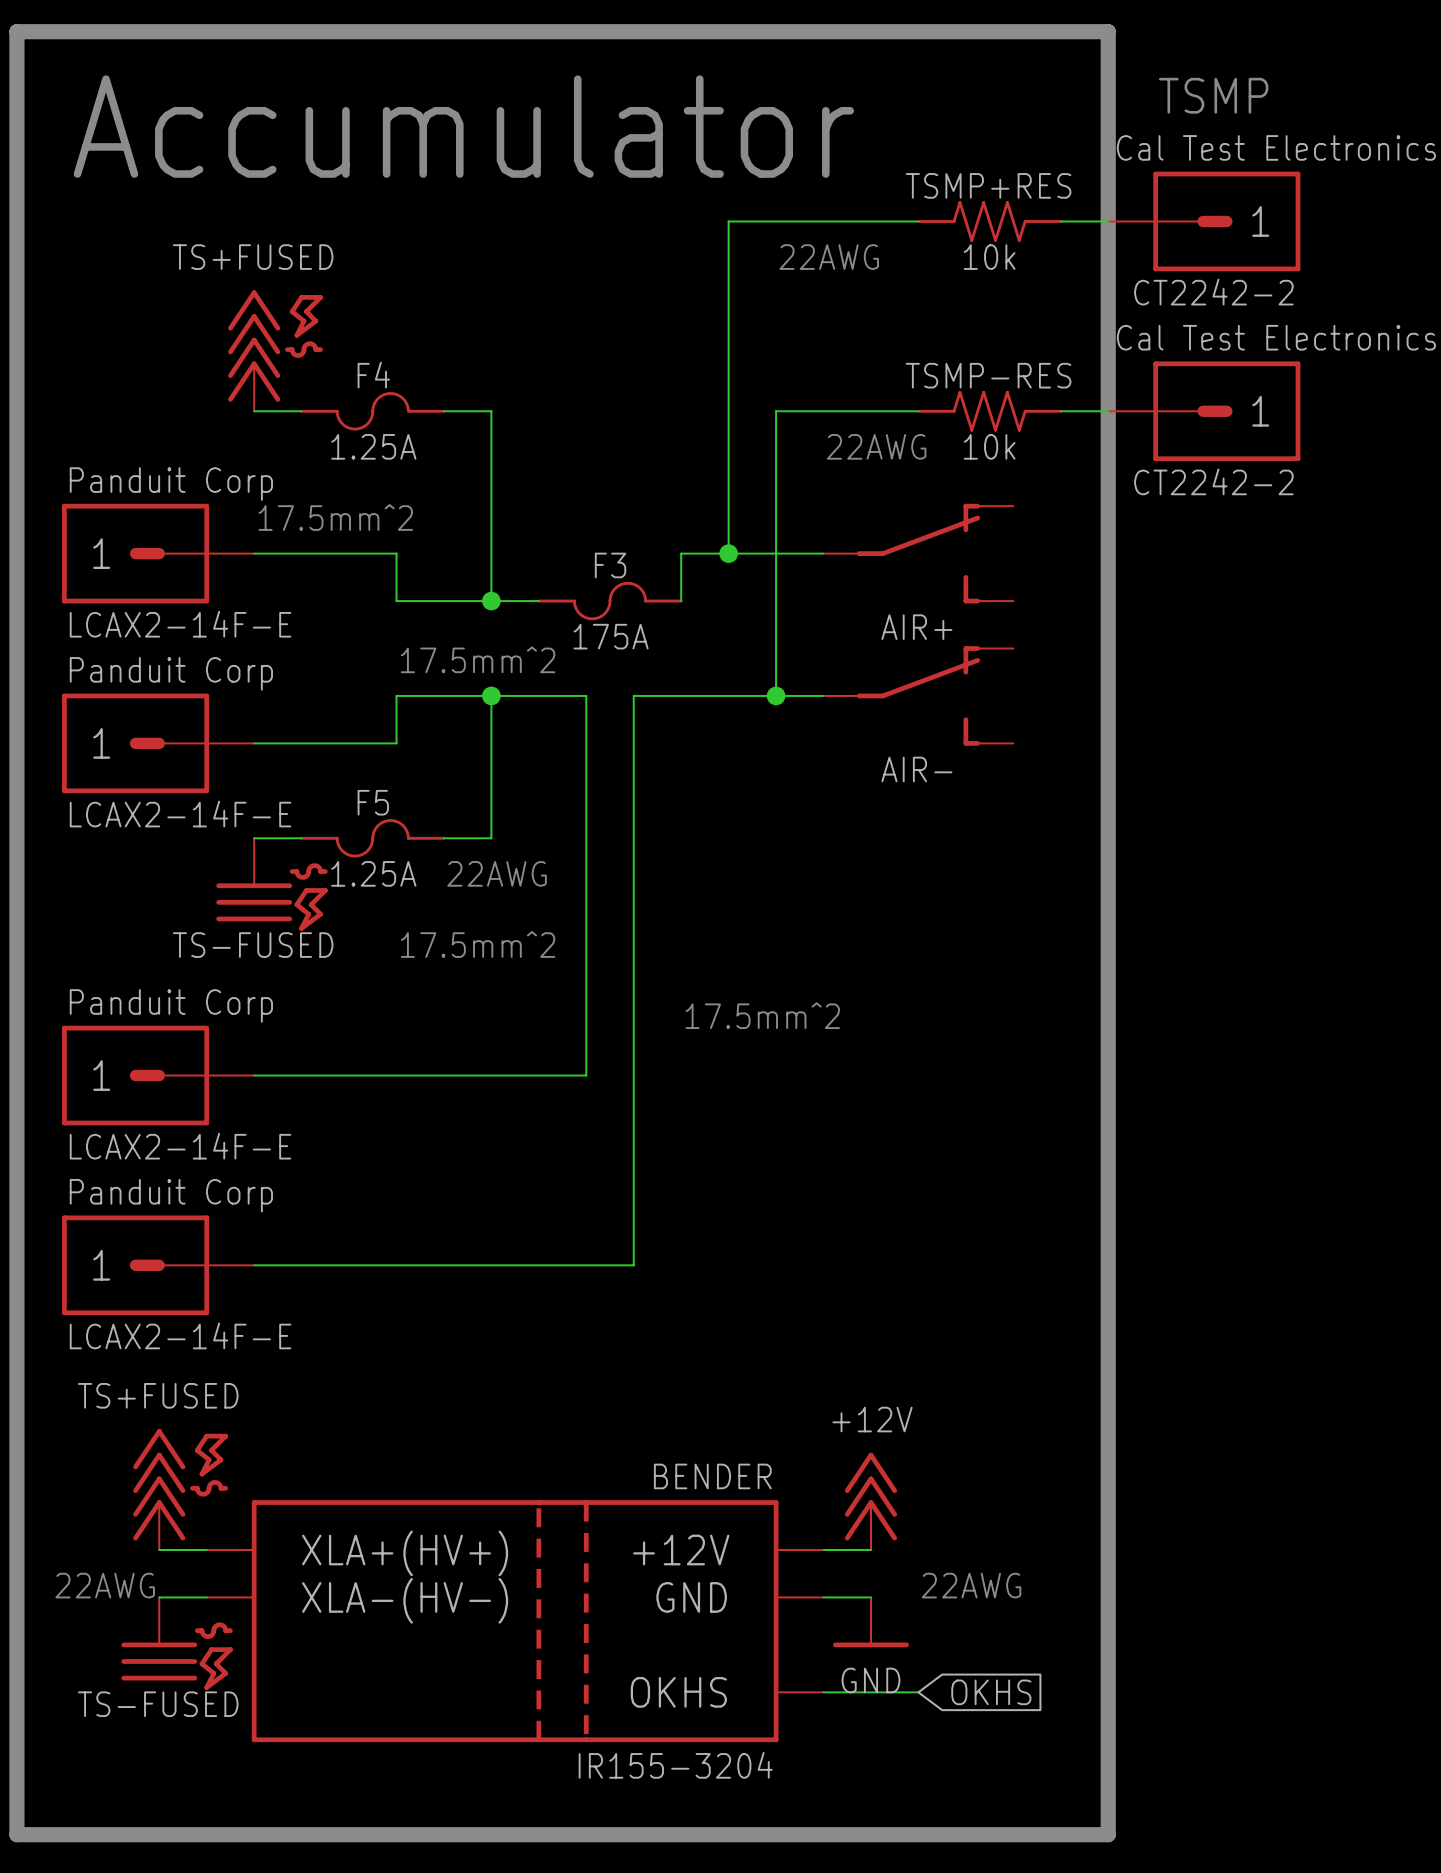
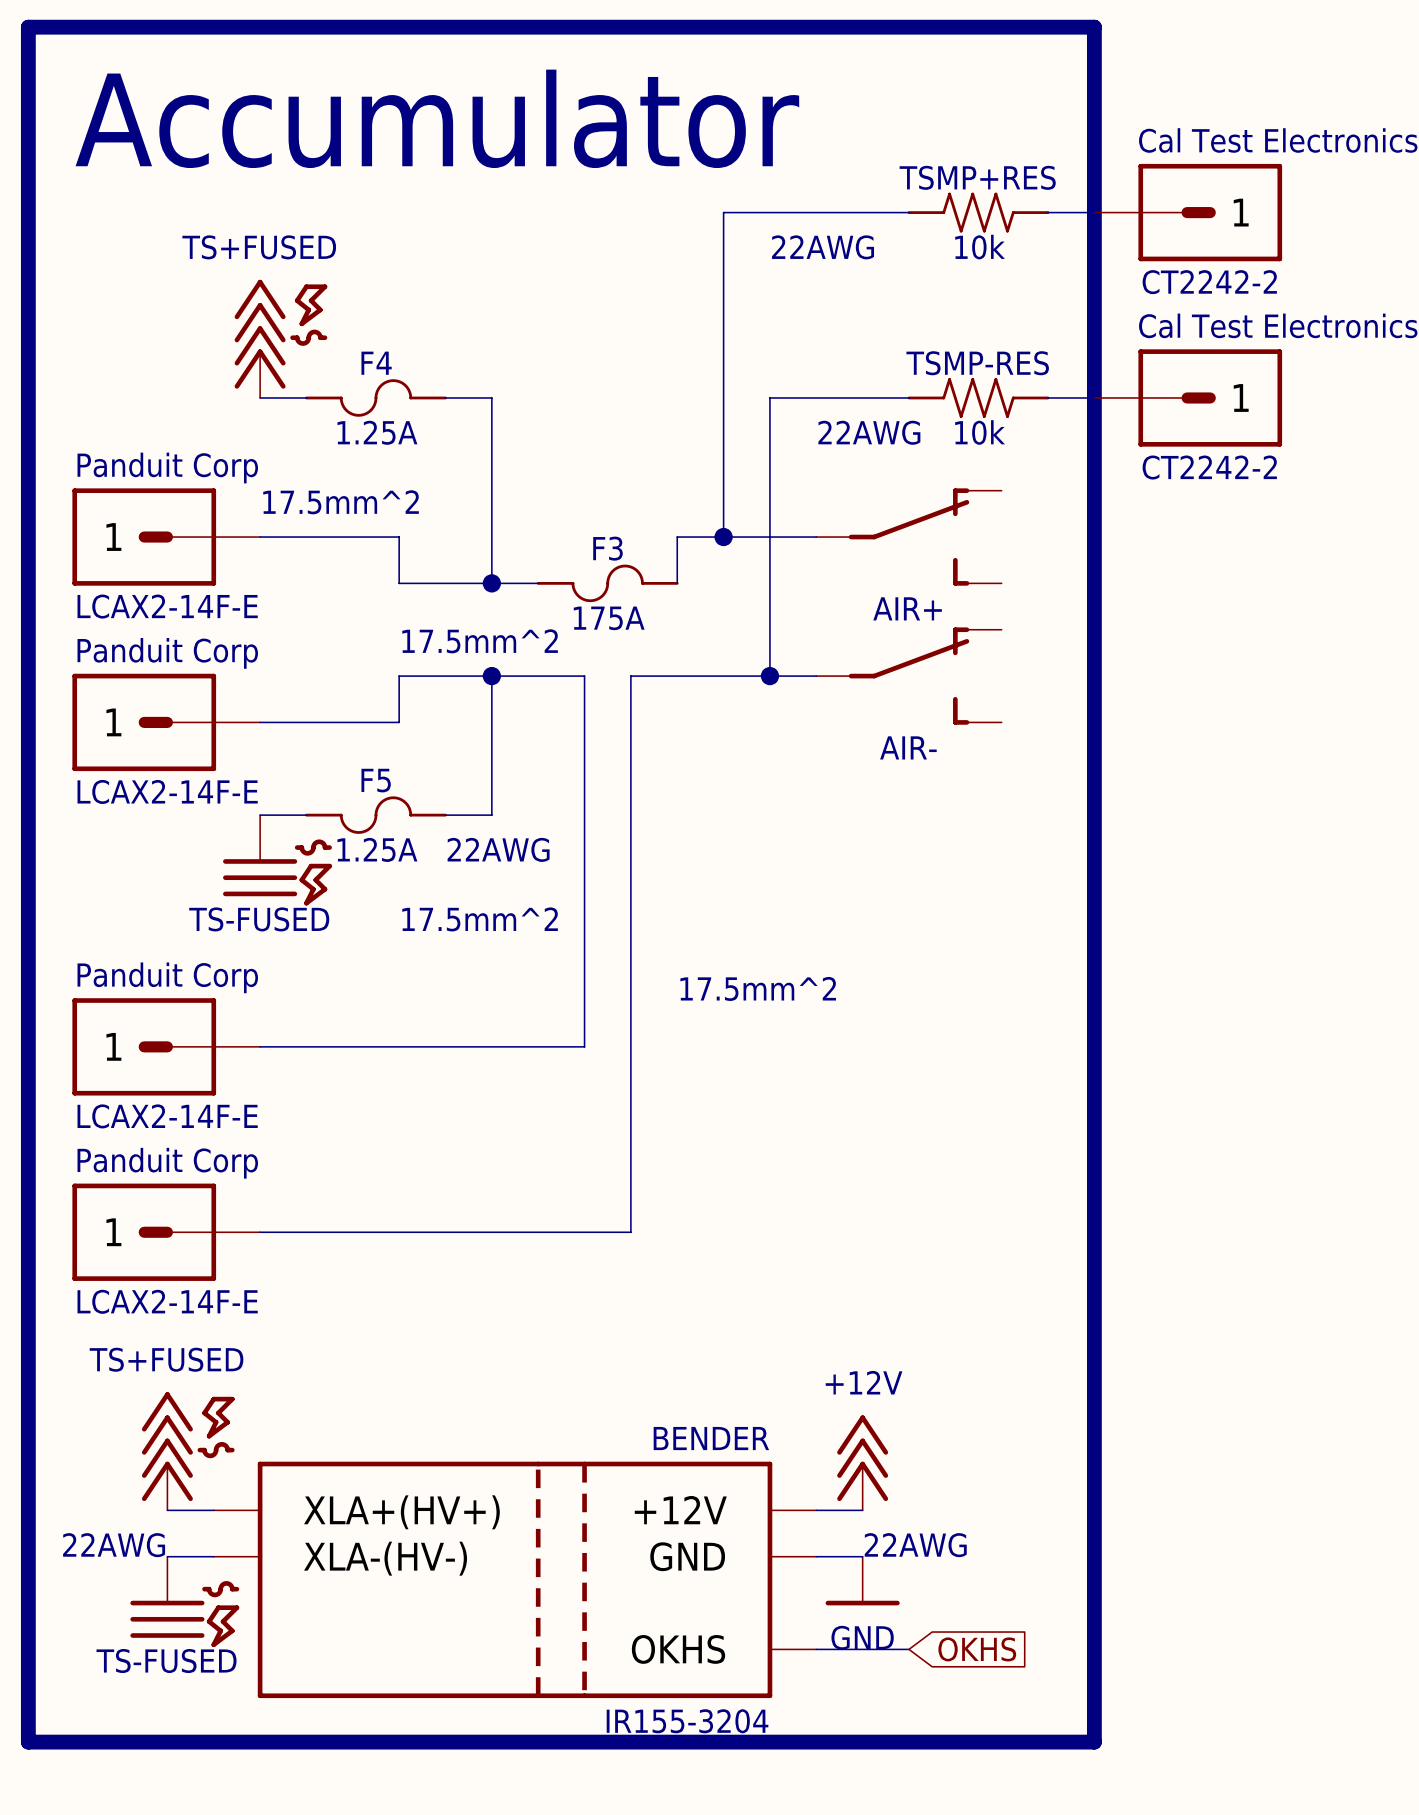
text: TSMP (1213, 95) -> none
text position: 22AWG (971, 1585) -> 22AWG (915, 1545)
line: (16, 1787) (16, 1834) (1108, 1834) (1108, 1787) -> (28, 1742) (1094, 1742)

